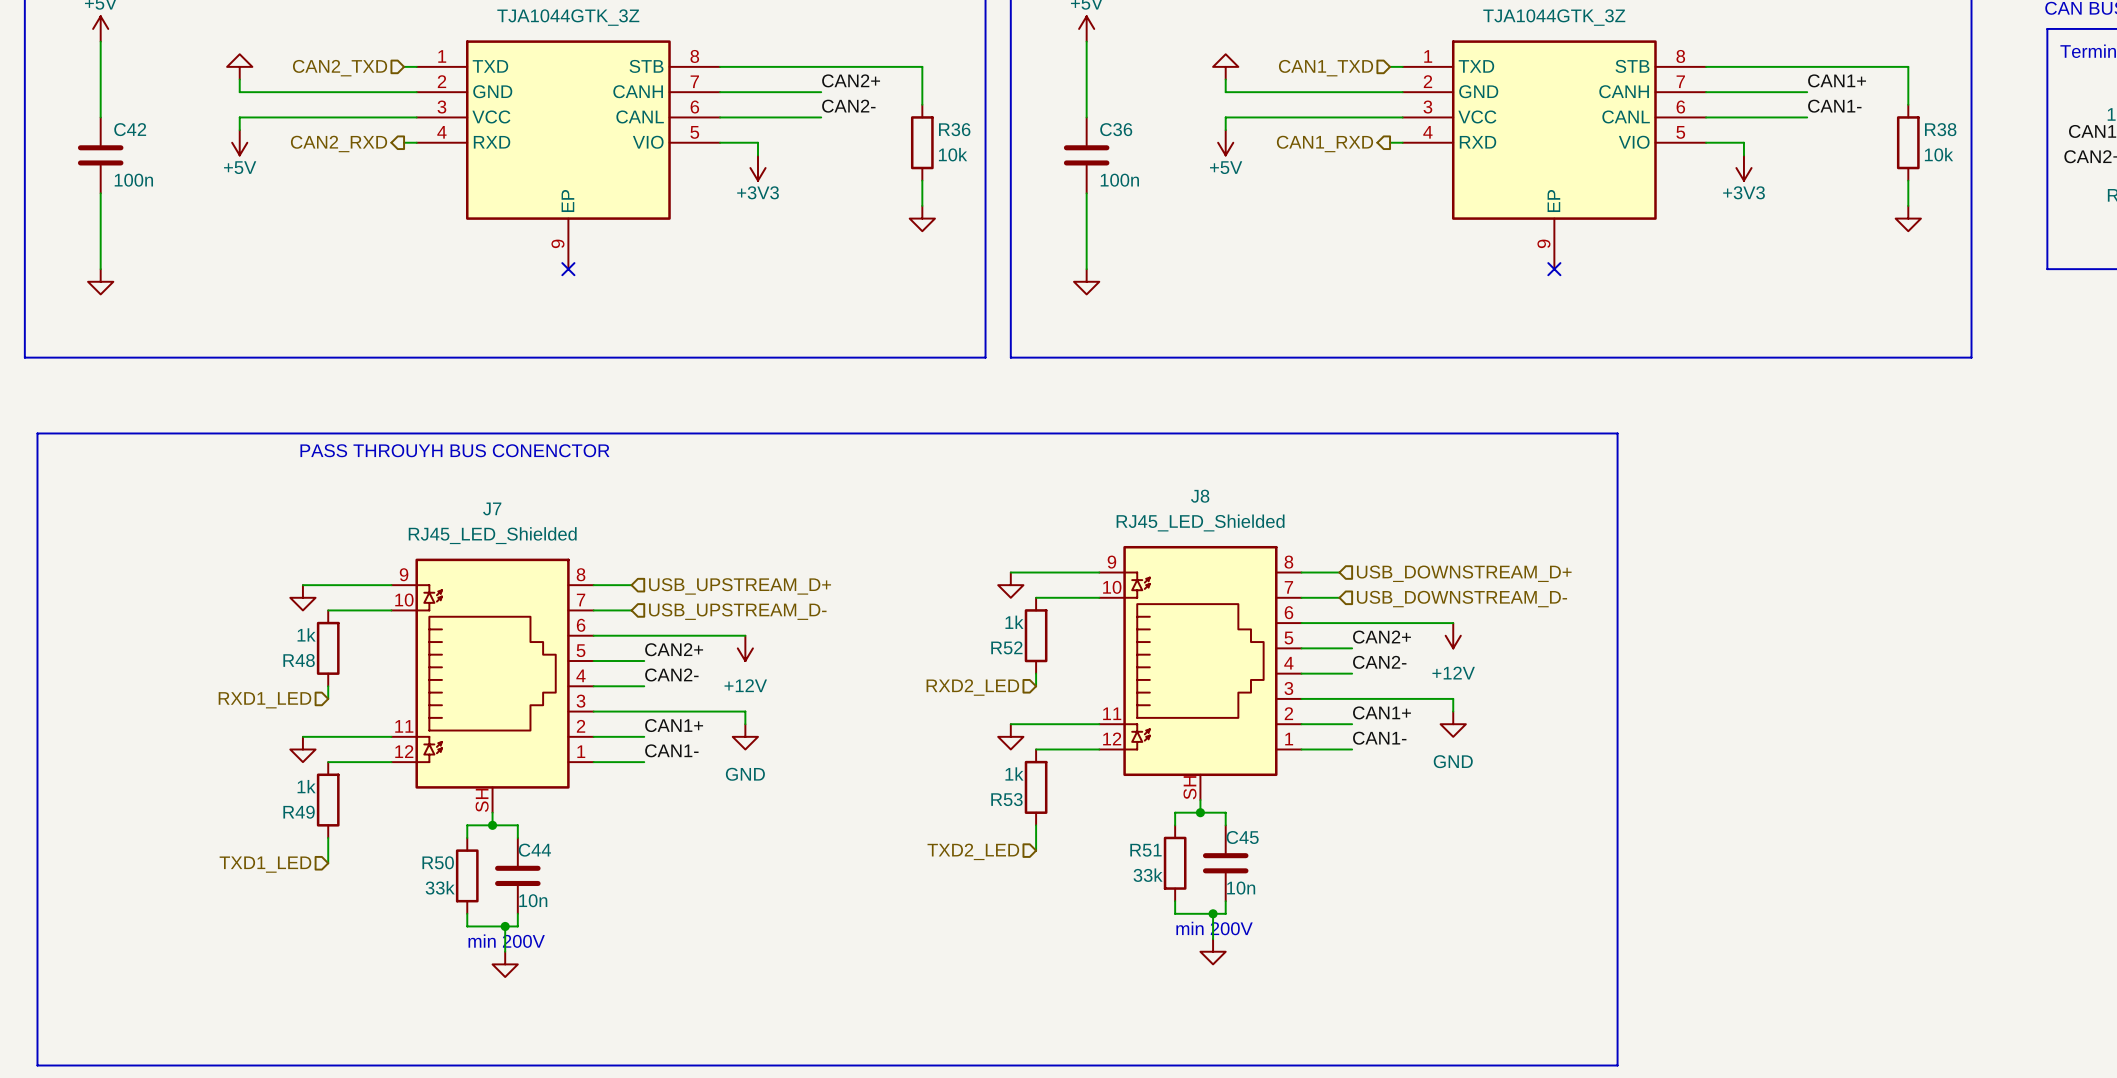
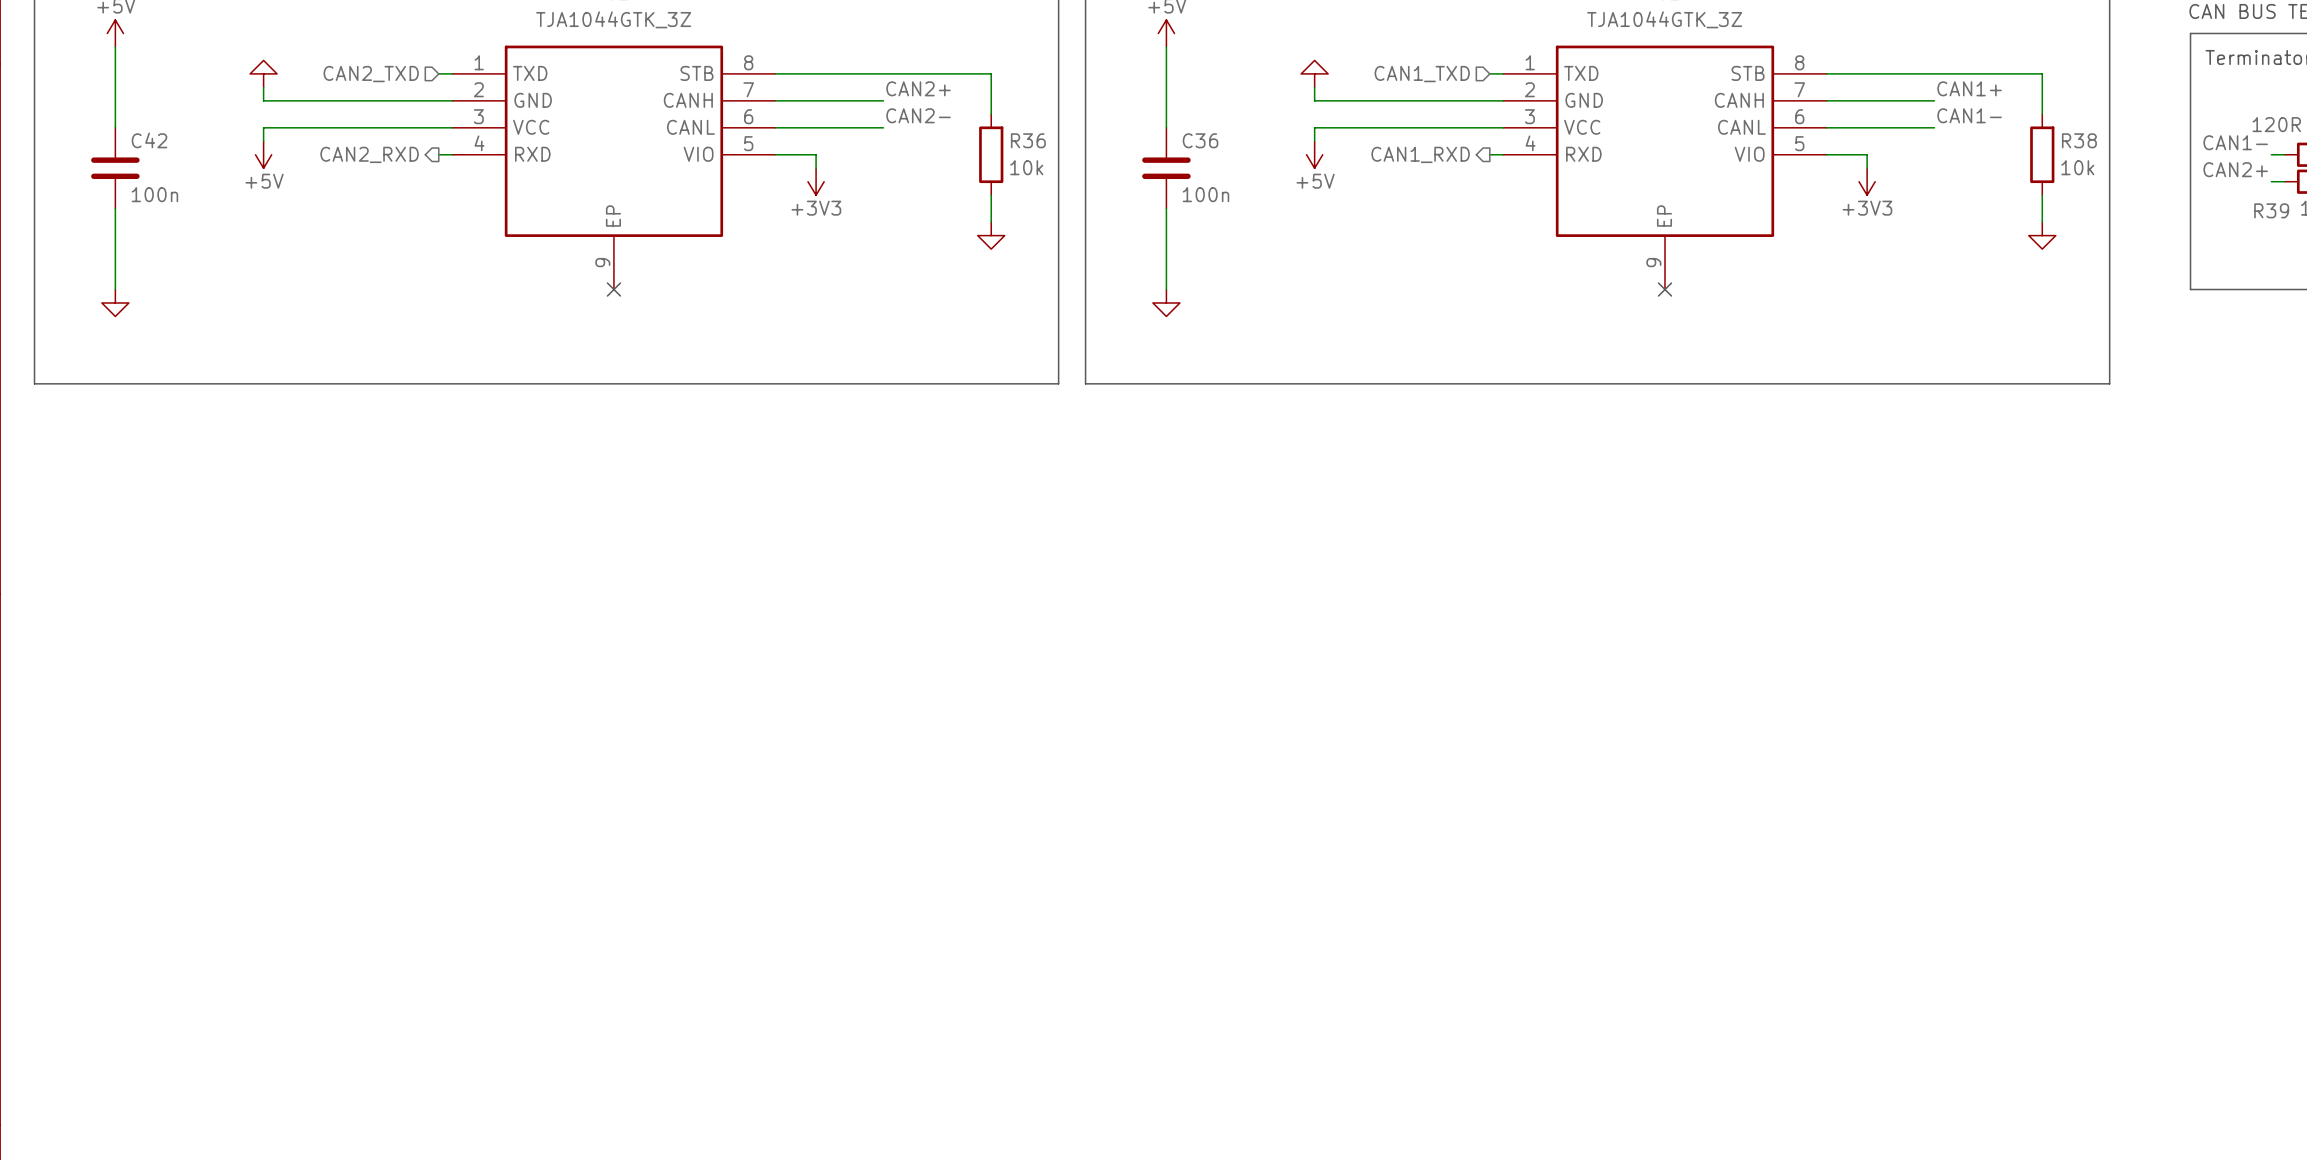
line: (37, 433) (1617, 433) (1617, 1065) (37, 1065) (37, 433) -> none
text: PASS THROUYH BUS CONENCTOR (454, 450) -> none
wire: (1010, 572) (1099, 572) -> none
wire: (1301, 572) (1339, 572) -> none
hierarchical label: USB_DOWNSTREAM_D+ (1464, 573) -> none
wire: (302, 585) (391, 585) -> none
wire: (593, 585) (631, 585) -> none
power symbol: (1010, 585) -> none
hierarchical label: USB_UPSTREAM_D+ (740, 586) -> none
power symbol: (302, 597) -> none
wire: (1036, 597) (1099, 597) -> none
wire: (1301, 597) (1339, 597) -> none
hierarchical label: USB_DOWNSTREAM_D- (1462, 599) -> none
wire: (328, 610) (391, 610) -> none
wire: (593, 610) (631, 610) -> none
hierarchical label: USB_UPSTREAM_D- (737, 611) -> none
wire: (1301, 623) (1453, 623) -> none
wire: (593, 635) (745, 635) -> none
R52: 1k (1036, 635) -> none
power symbol: +12V (1453, 635) -> none
label: CAN2+ (1382, 637) -> none
R48: 1k (328, 648) -> none
power symbol: +12V (745, 648) -> none
wire: (1301, 648) (1352, 648) -> none
label: CAN2+ (674, 649) -> none
wire: (593, 661) (644, 661) -> none
label: CAN2- (1379, 662) -> none
wire: (1036, 673) (1036, 686) -> none
J8: RJ45_LED_Shielded (1200, 673) -> none
wire: (1301, 673) (1352, 673) -> none
label: CAN2- (671, 675) -> none
J7: RJ45_LED_Shielded (492, 685) -> none
wire: (328, 686) (328, 698) -> none
wire: (593, 686) (644, 686) -> none
hierarchical label: RXD2_LED (972, 687) -> none
wire: (1301, 698) (1453, 698) (1453, 711) -> none
hierarchical label: RXD1_LED (264, 700) -> none
wire: (593, 711) (745, 711) (745, 724) -> none
label: CAN1+ (1382, 712) -> none
wire: (1010, 724) (1099, 724) -> none
wire: (1301, 724) (1352, 724) -> none
power symbol: GND (1453, 724) -> none
label: CAN1+ (674, 725) -> none
wire: (302, 736) (391, 736) -> none
wire: (593, 736) (644, 736) -> none
power symbol: GND (745, 736) -> none
power symbol: (1010, 736) -> none
label: CAN1- (1379, 738) -> none
power symbol: (302, 749) -> none
wire: (1036, 749) (1099, 749) -> none
wire: (1301, 749) (1352, 749) -> none
label: CAN1- (671, 750) -> none
wire: (328, 762) (391, 762) -> none
wire: (593, 762) (644, 762) -> none
R53: 1k (1036, 787) -> none
R49: 1k (328, 800) -> none
wire: (1200, 800) (1200, 812) -> none
wire: (492, 812) (492, 825) -> none
junction: (1200, 812) -> none
junction: (492, 825) -> none
wire: (1036, 825) (1036, 850) -> none
wire: (1175, 825) (1175, 812) (1225, 812) (1225, 825) -> none
wire: (328, 837) (328, 863) -> none
wire: (467, 837) (467, 825) (517, 825) (517, 837) -> none
hierarchical label: TXD2_LED (973, 851) -> none
R51: 33k (1175, 863) -> none
C45: 10n (1225, 863) -> none
hierarchical label: TXD1_LED (265, 864) -> none
R50: 33k (467, 875) -> none
C44: 10n (517, 875) -> none
wire: (1175, 901) (1175, 913) (1225, 913) (1225, 901) -> none
wire: (467, 913) (467, 926) (517, 926) (517, 913) -> none
wire: (1213, 913) (1213, 939) -> none
junction: (1213, 913) -> none
wire: (505, 926) (505, 951) -> none
junction: (505, 926) -> none
text: min 200V (1214, 928) -> none
text: min 200V (506, 941) -> none
power symbol: (1213, 951) -> none
power symbol: (505, 964) -> none

